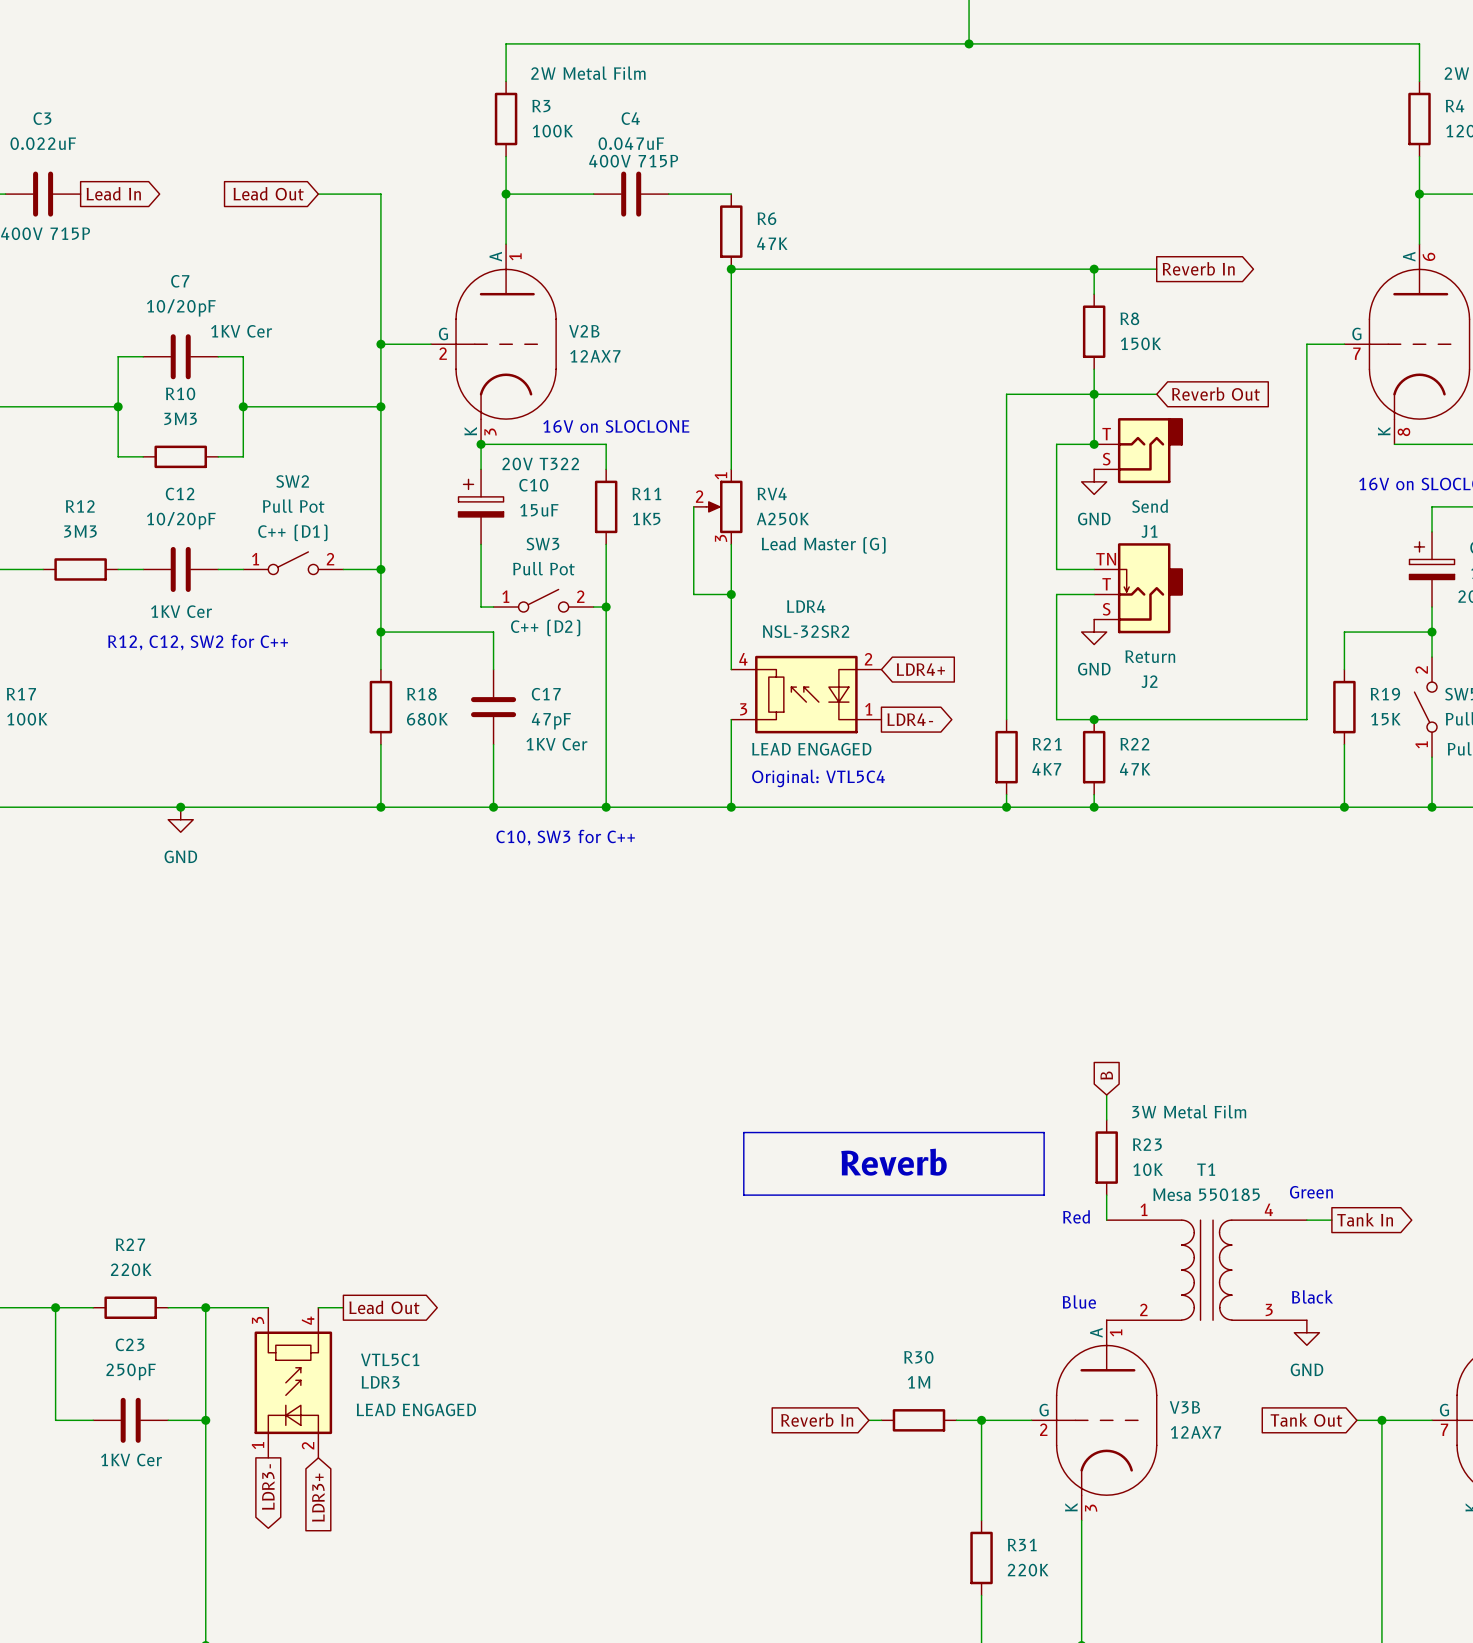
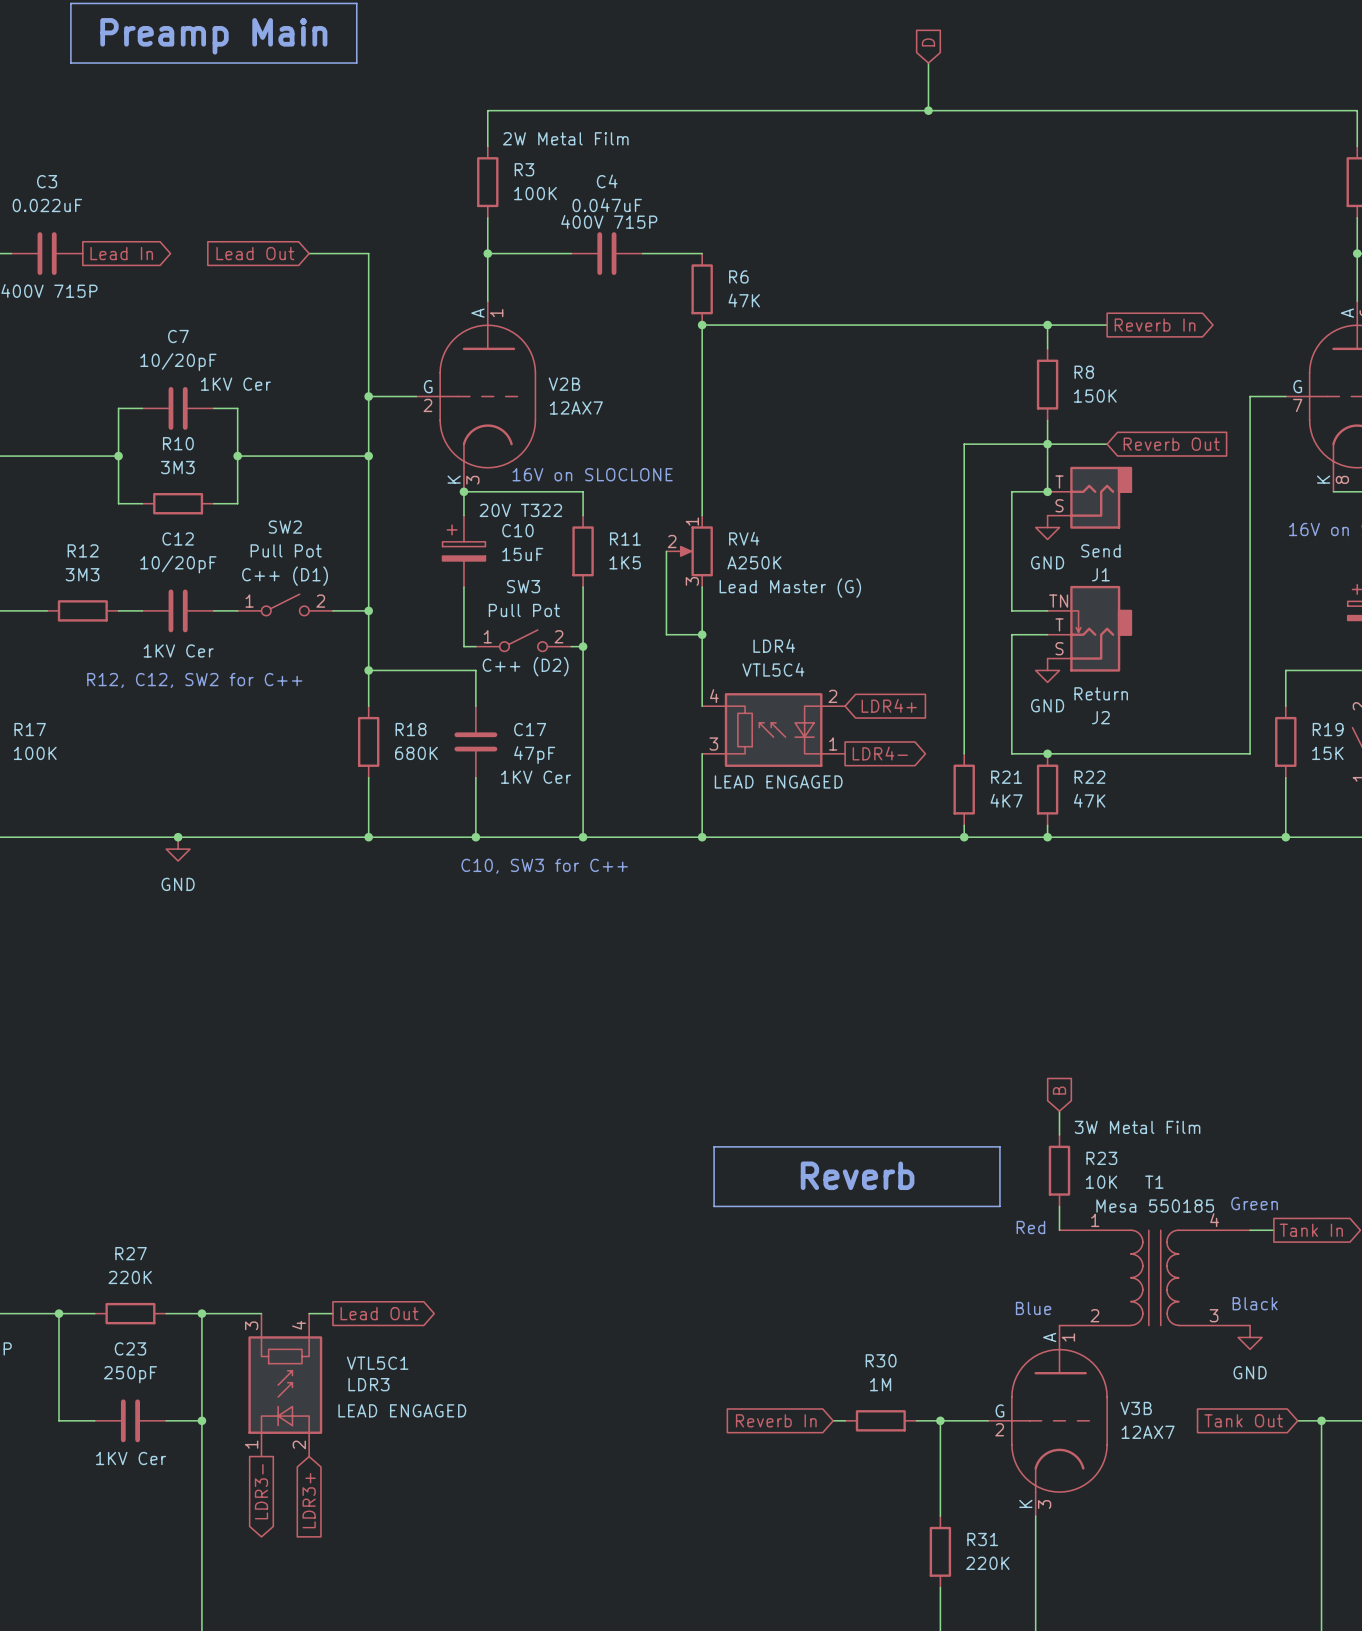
LDR4 value: NSL-32SR2 (806, 631) -> VTL5C4 (773, 669)
text: Original: VTL5C4 (818, 778) -> none

